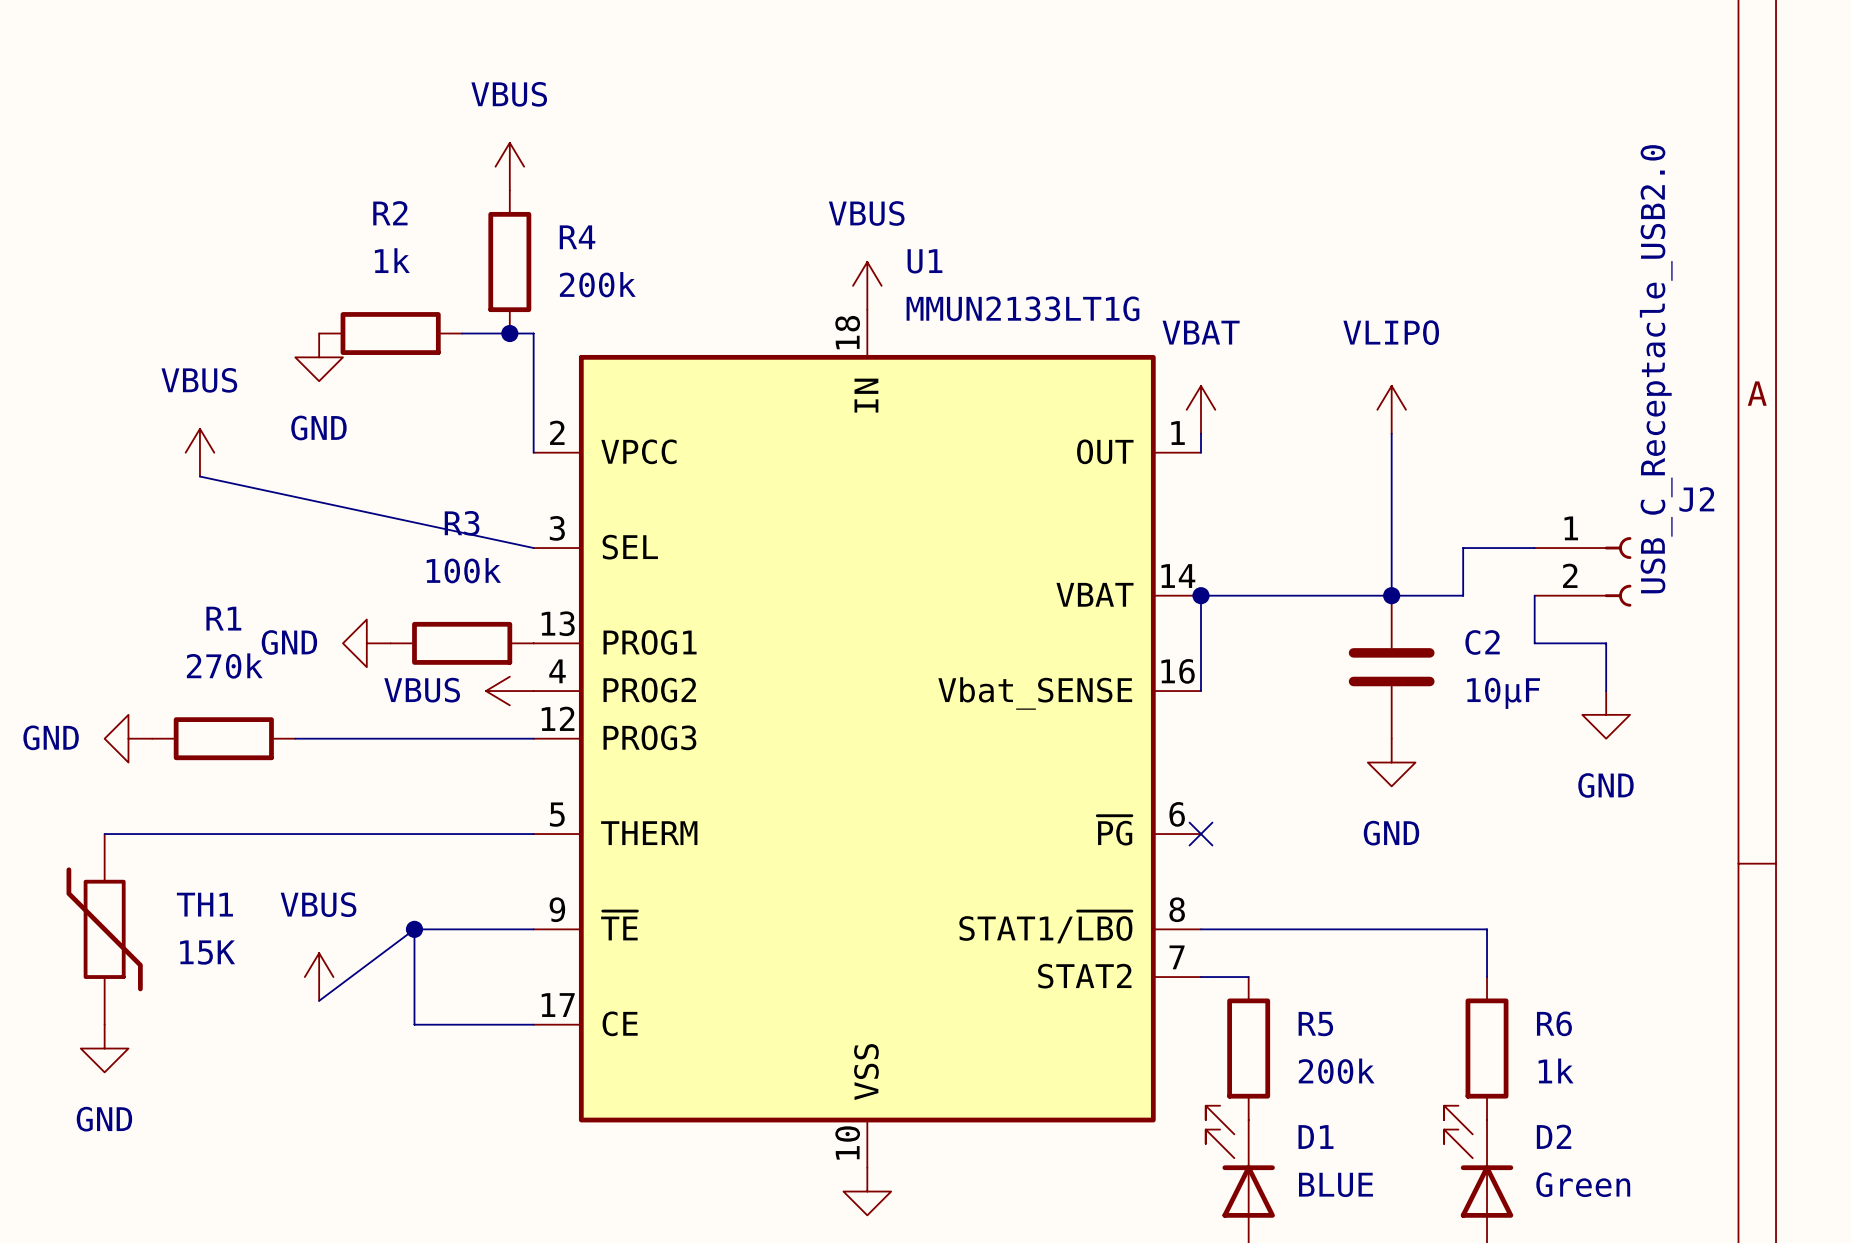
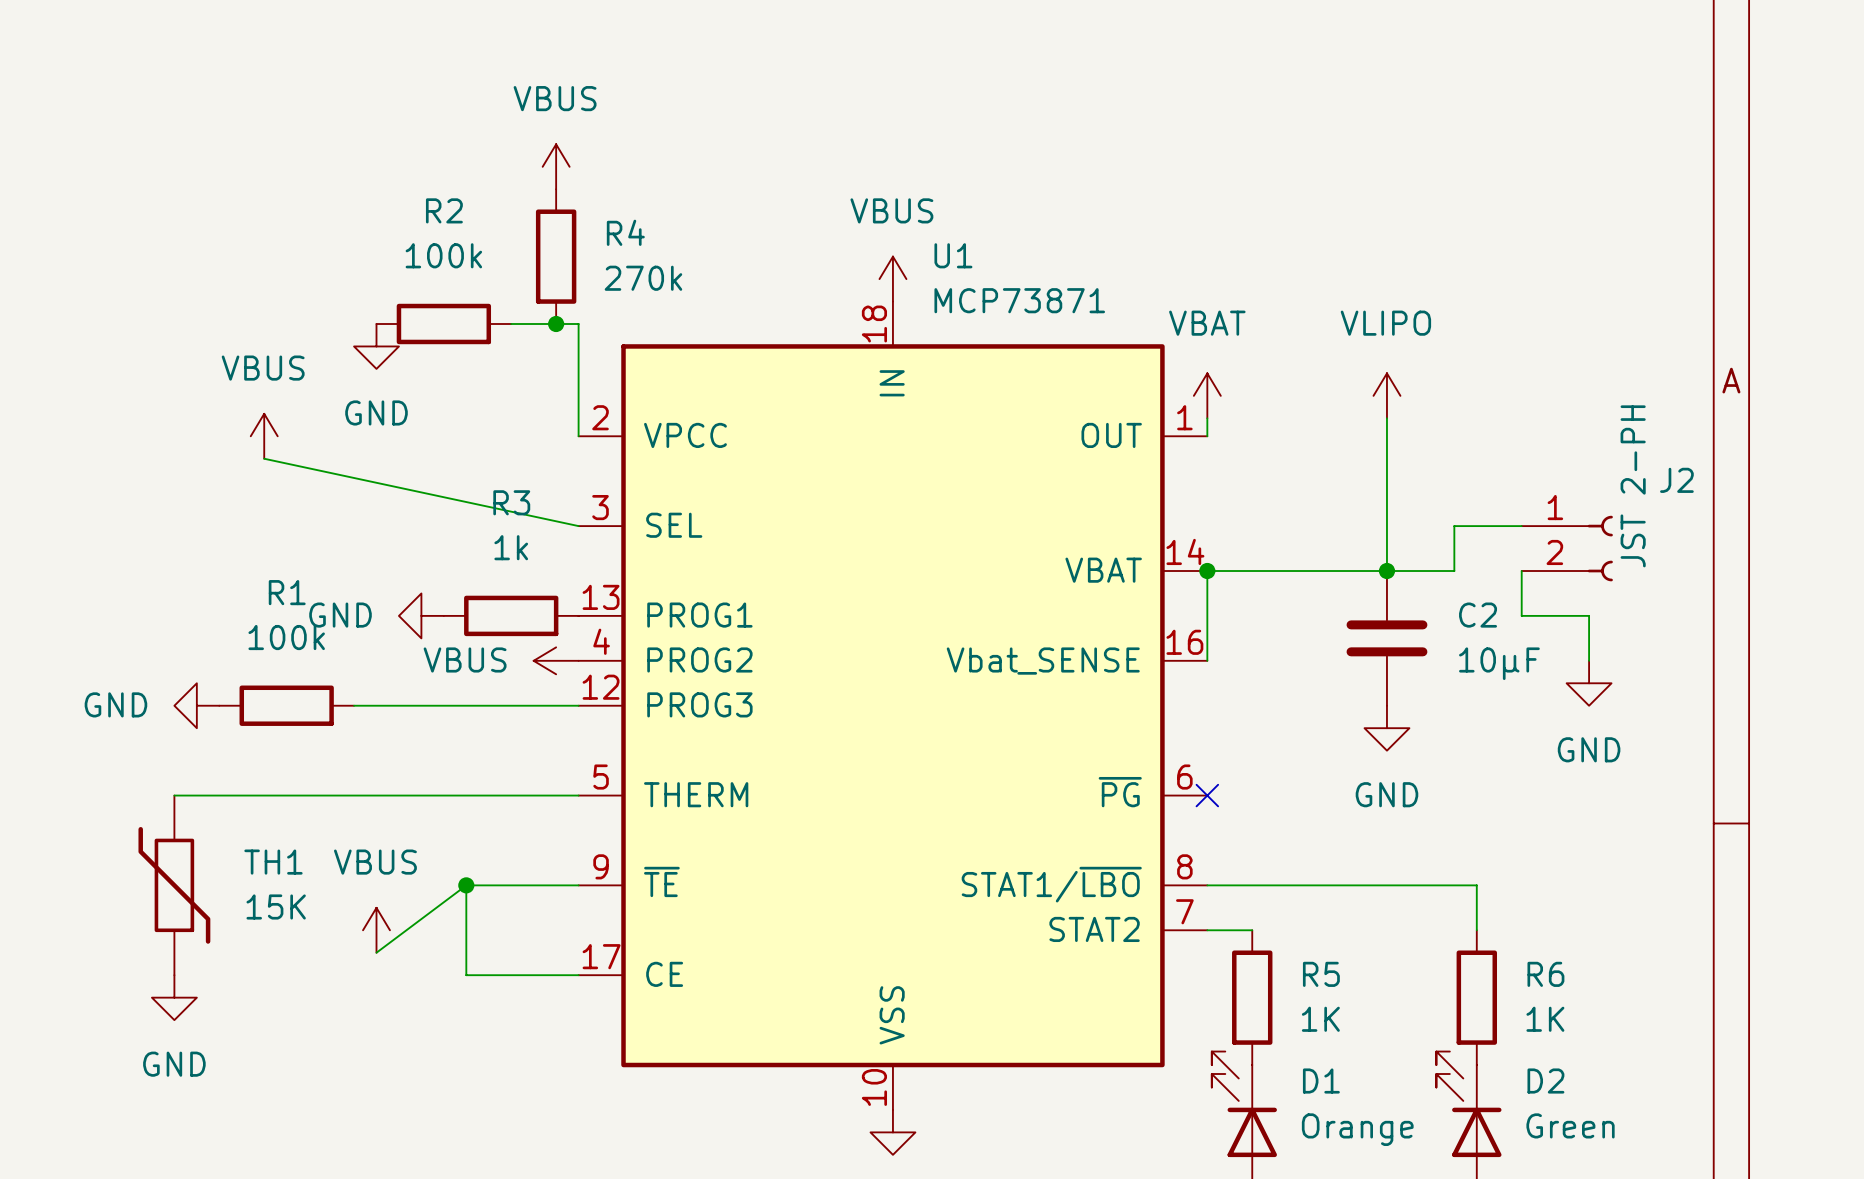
R2 value: 1k (392, 260) -> 100k (443, 255)
R4 value: 200k (597, 284) -> 270k (643, 278)
U1 value: MMUN2133LT1G (1022, 308) -> MCP73871 (1019, 300)
J2 value: USB_C_Receptacle_USB2.0 (1656, 369) -> JST 2-PH (1633, 486)
R3 value: 100k (463, 570) -> 1k (511, 547)
R1 value: 270k (224, 666) -> 100k (286, 637)
R6 value: 1k (1556, 1070) -> 1K (1545, 1019)
R5 value: 200k (1336, 1071) -> 1K (1320, 1019)
D1 value: BLUE (1335, 1184) -> Orange (1357, 1129)

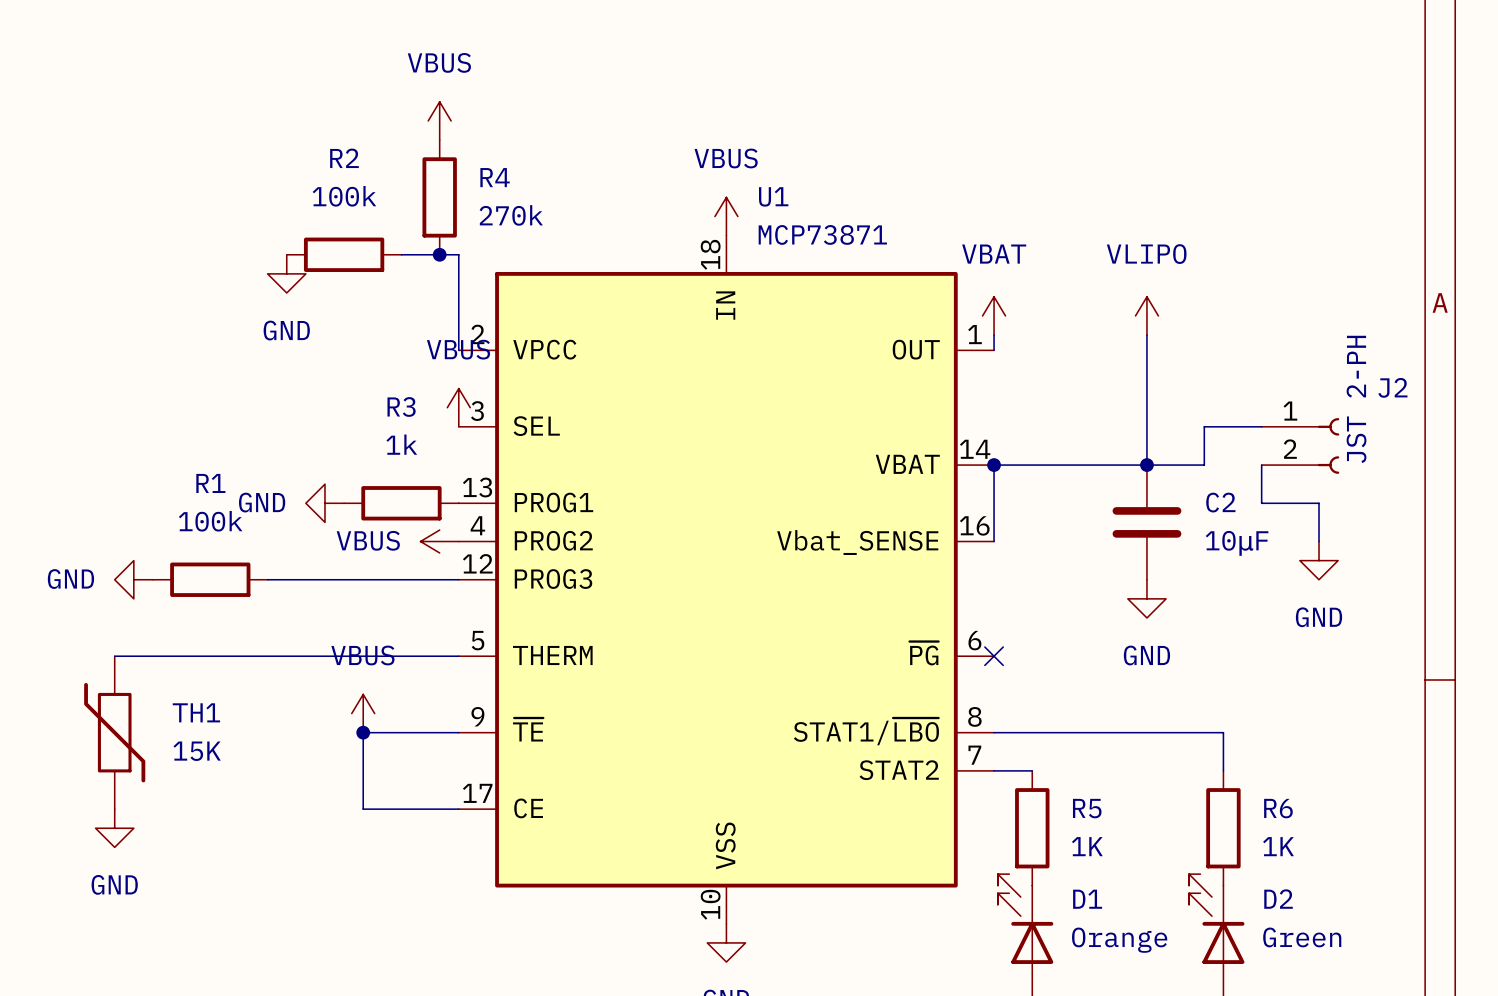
power symbol: VBUS (264, 436) -> none
wire: (264, 458) (578, 526) -> none
power symbol: none -> VBUS (458, 407)
wire: (466, 885) (376, 952) -> none
power symbol position: VBUS (376, 930) -> VBUS (363, 713)

